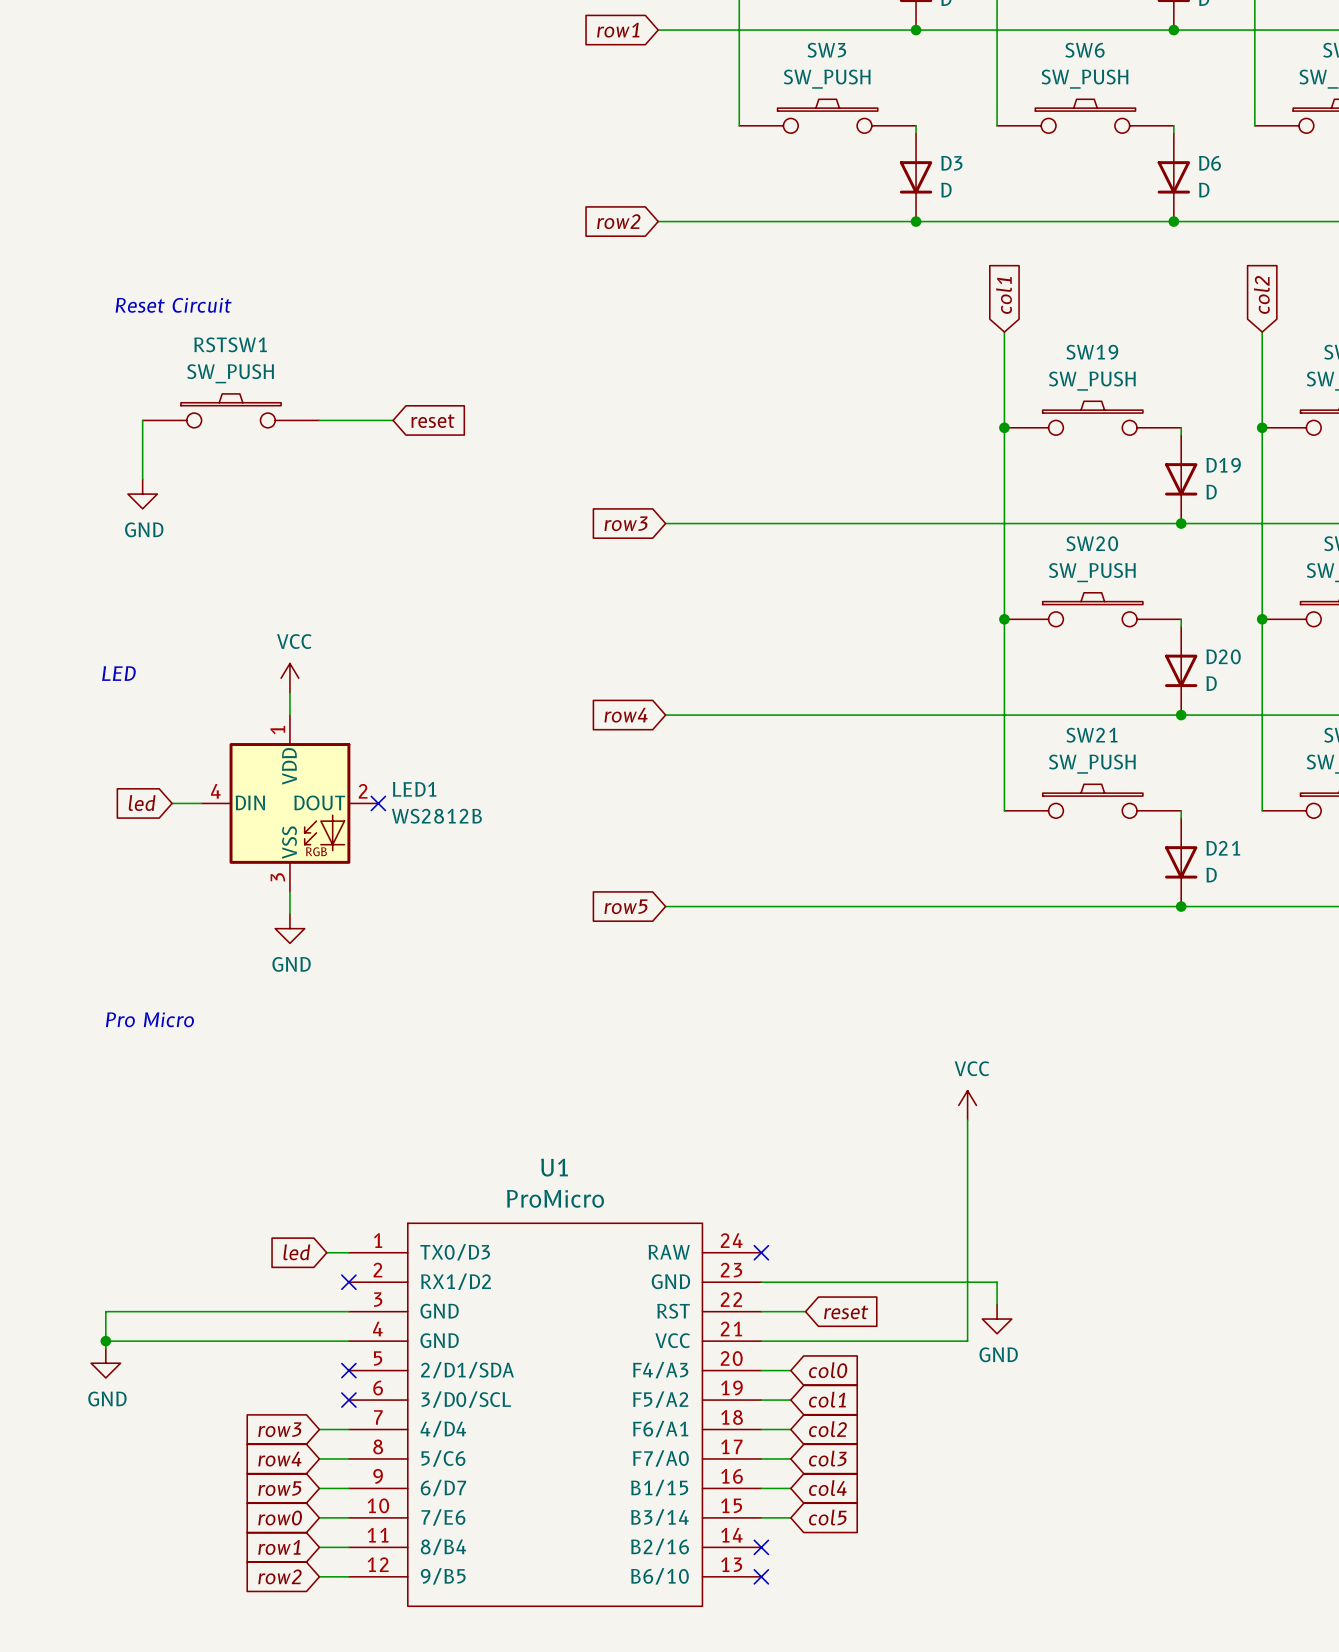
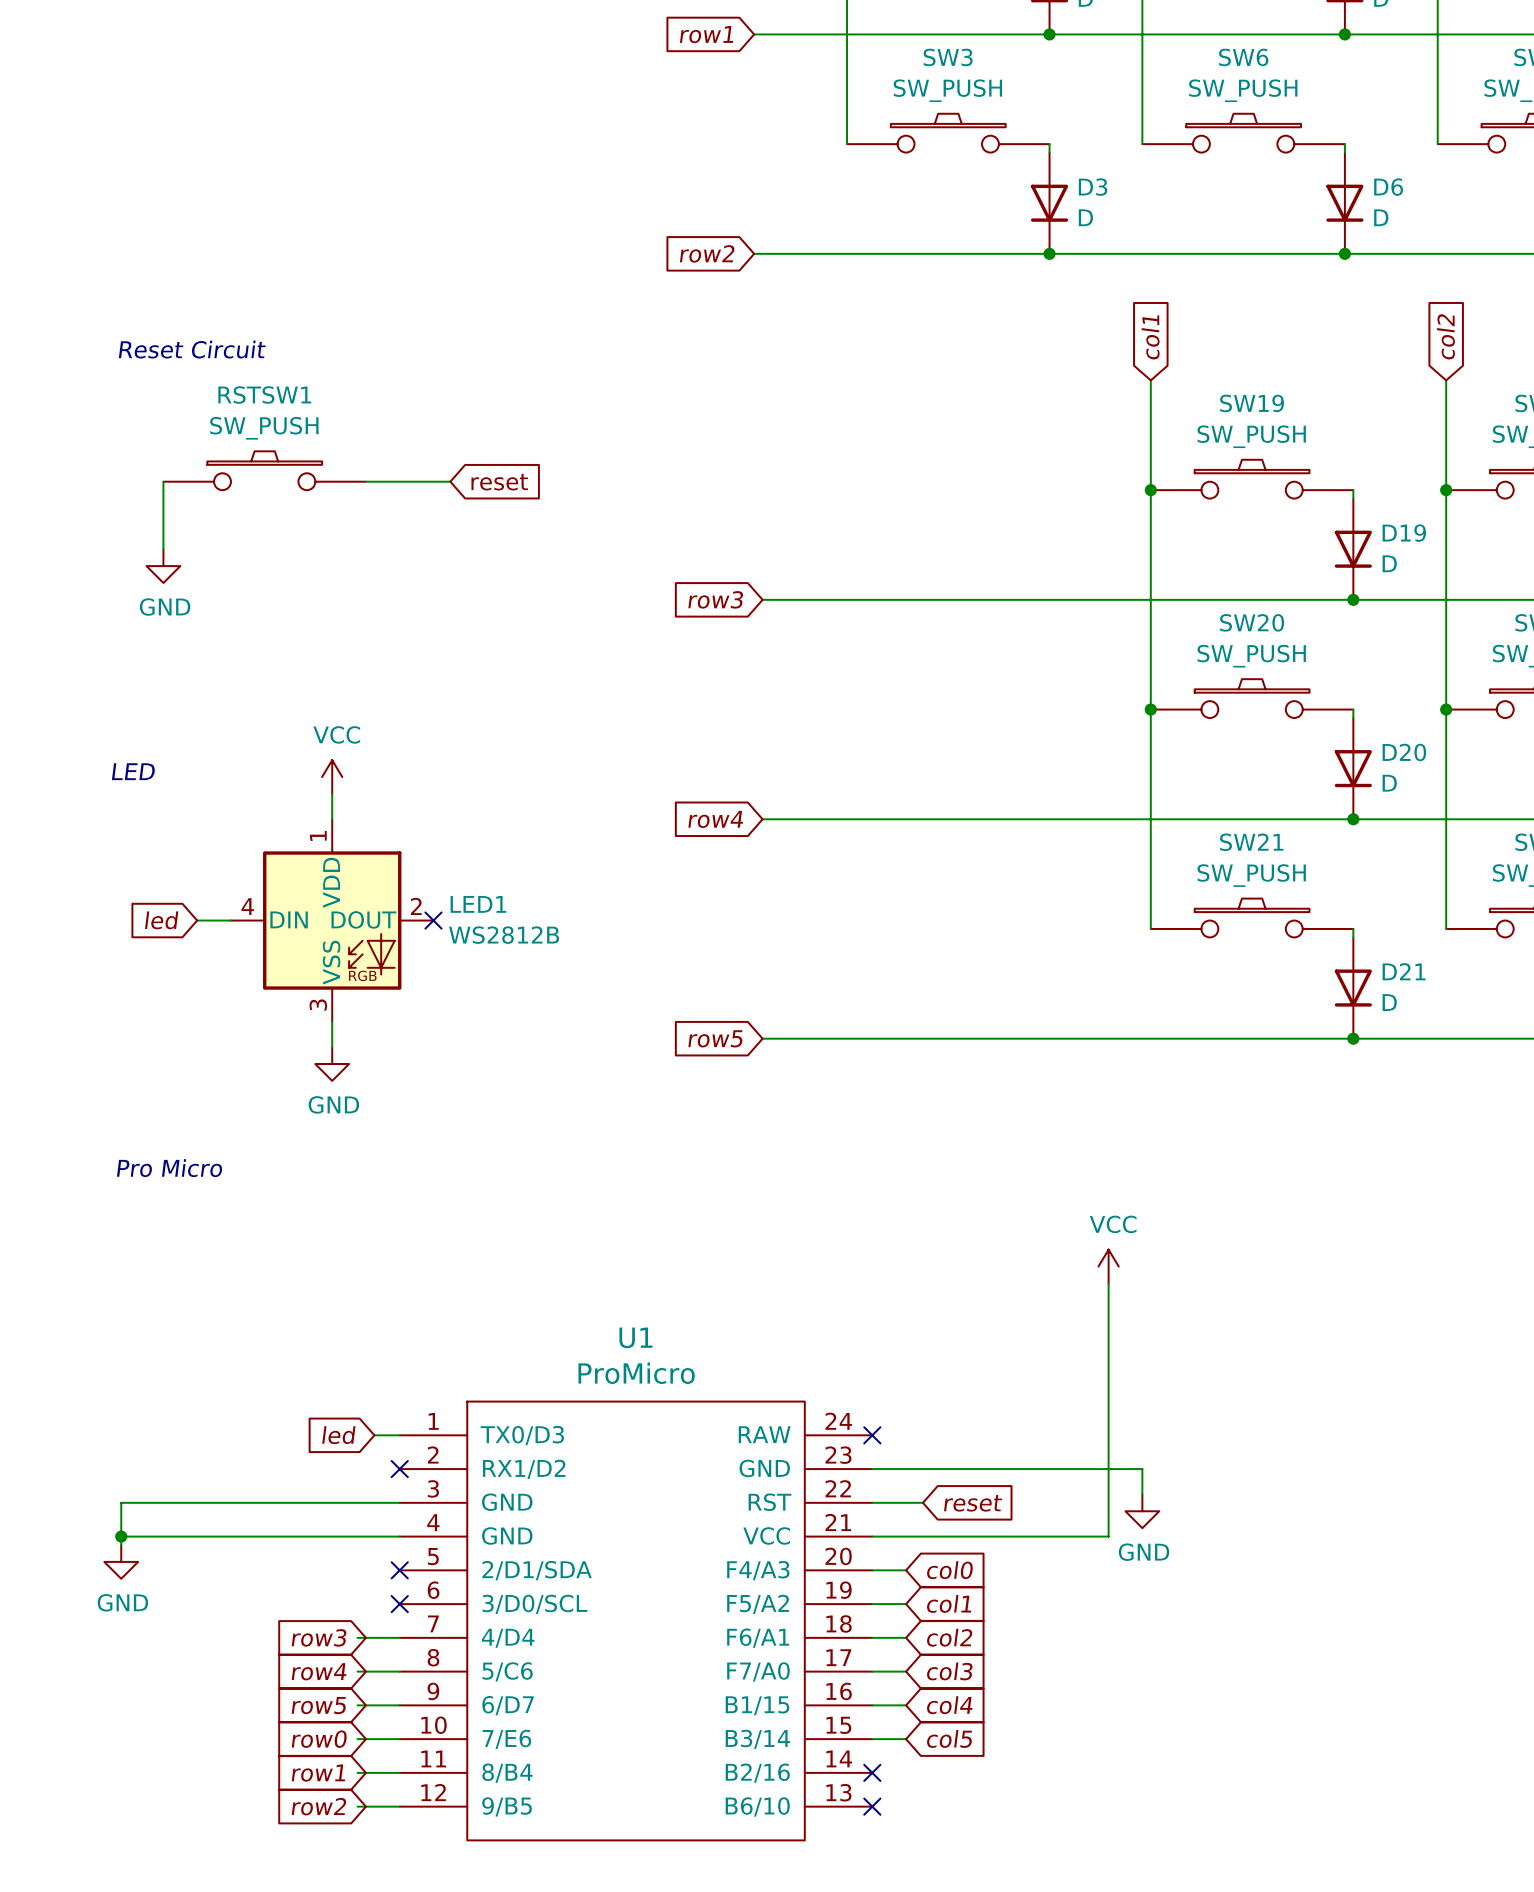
wire: none -> (357, 1637) (365, 1637)
wire: none -> (357, 1671) (365, 1671)
wire: none -> (357, 1705) (365, 1705)
wire: none -> (357, 1739) (365, 1739)
wire: none -> (357, 1772) (365, 1772)
wire: none -> (357, 1806) (365, 1806)

